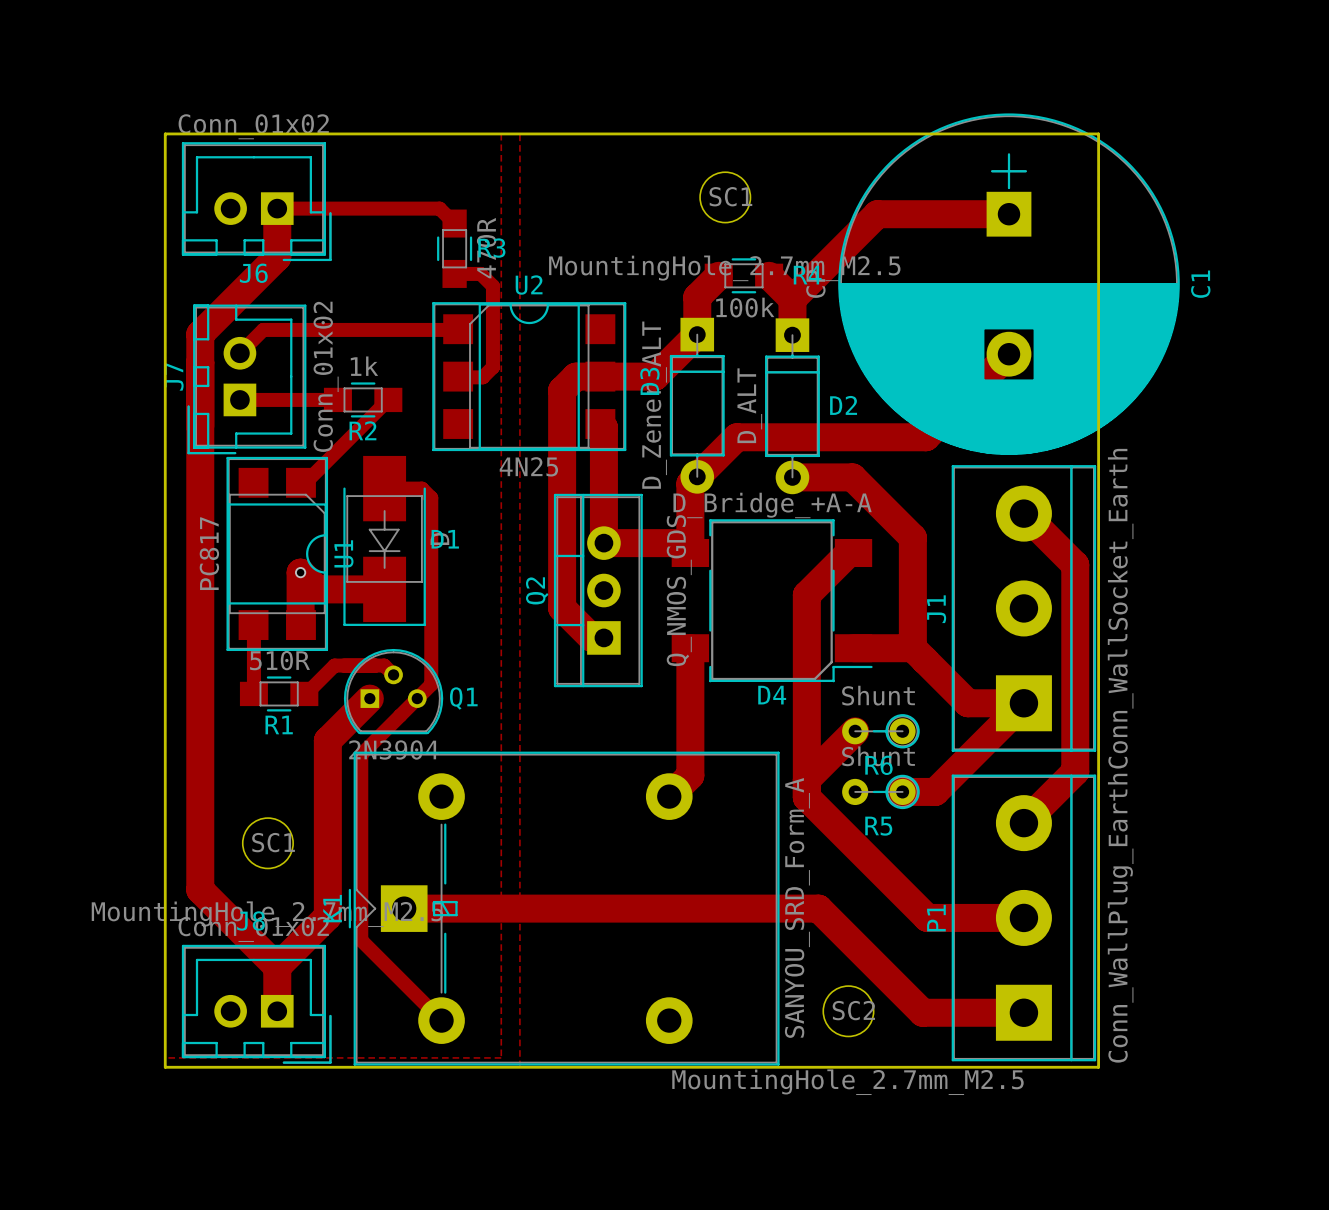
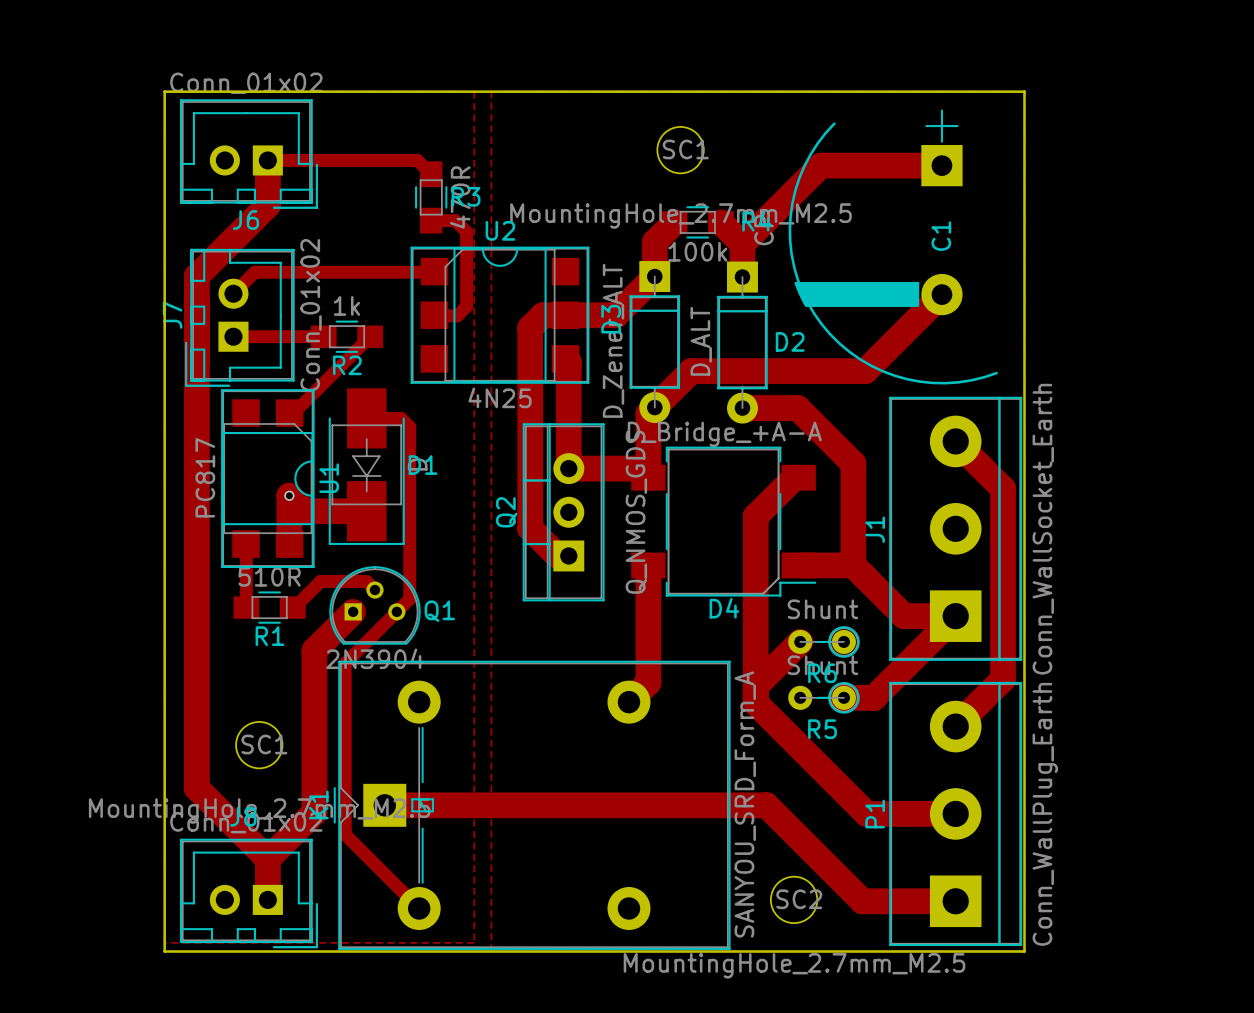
C1 footprint: [838, 113, 1180, 456] -> [788, 109, 998, 385]
C1 name position: C1 (1200, 284) -> C1 (941, 236)

